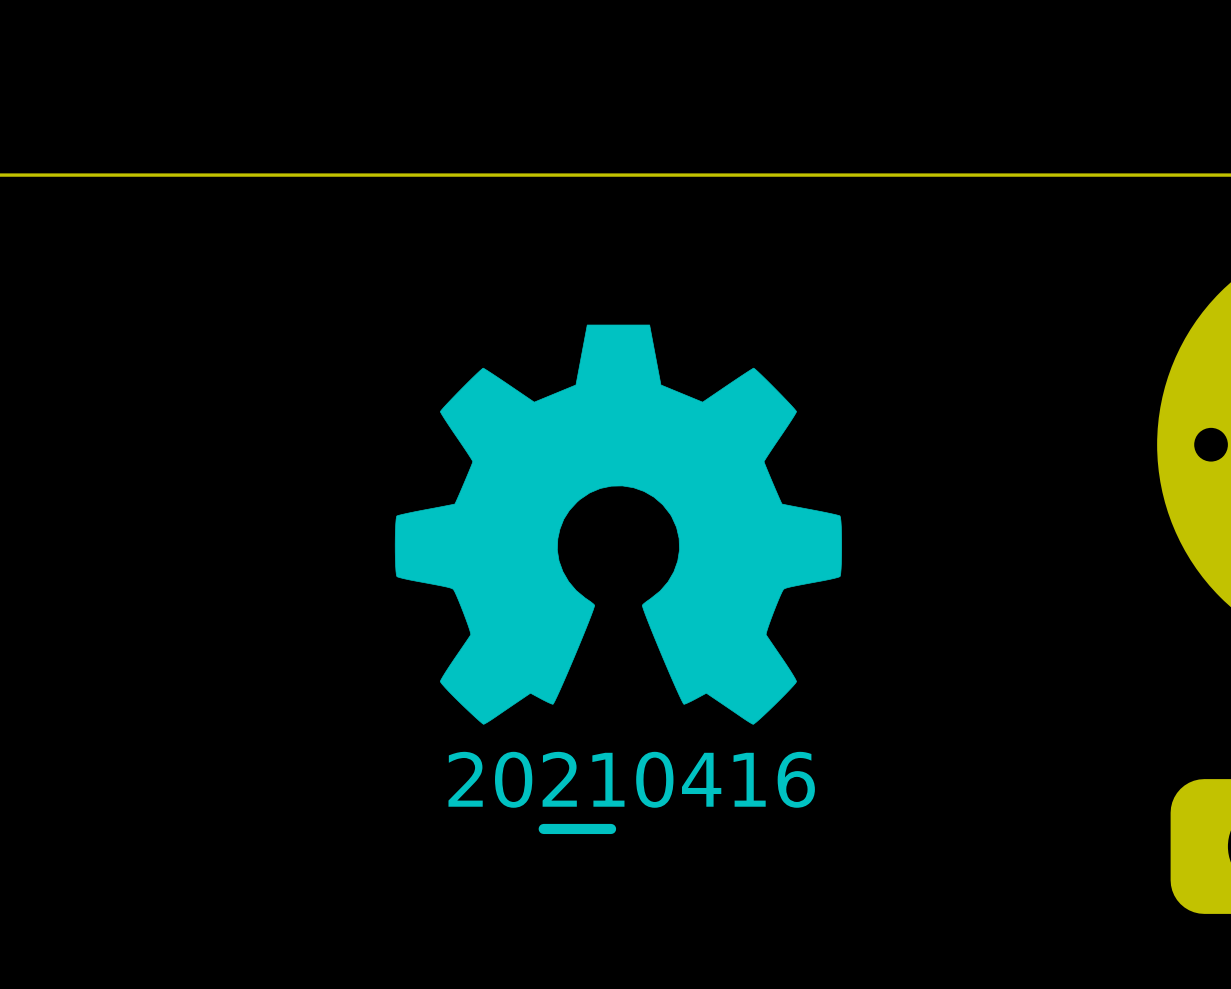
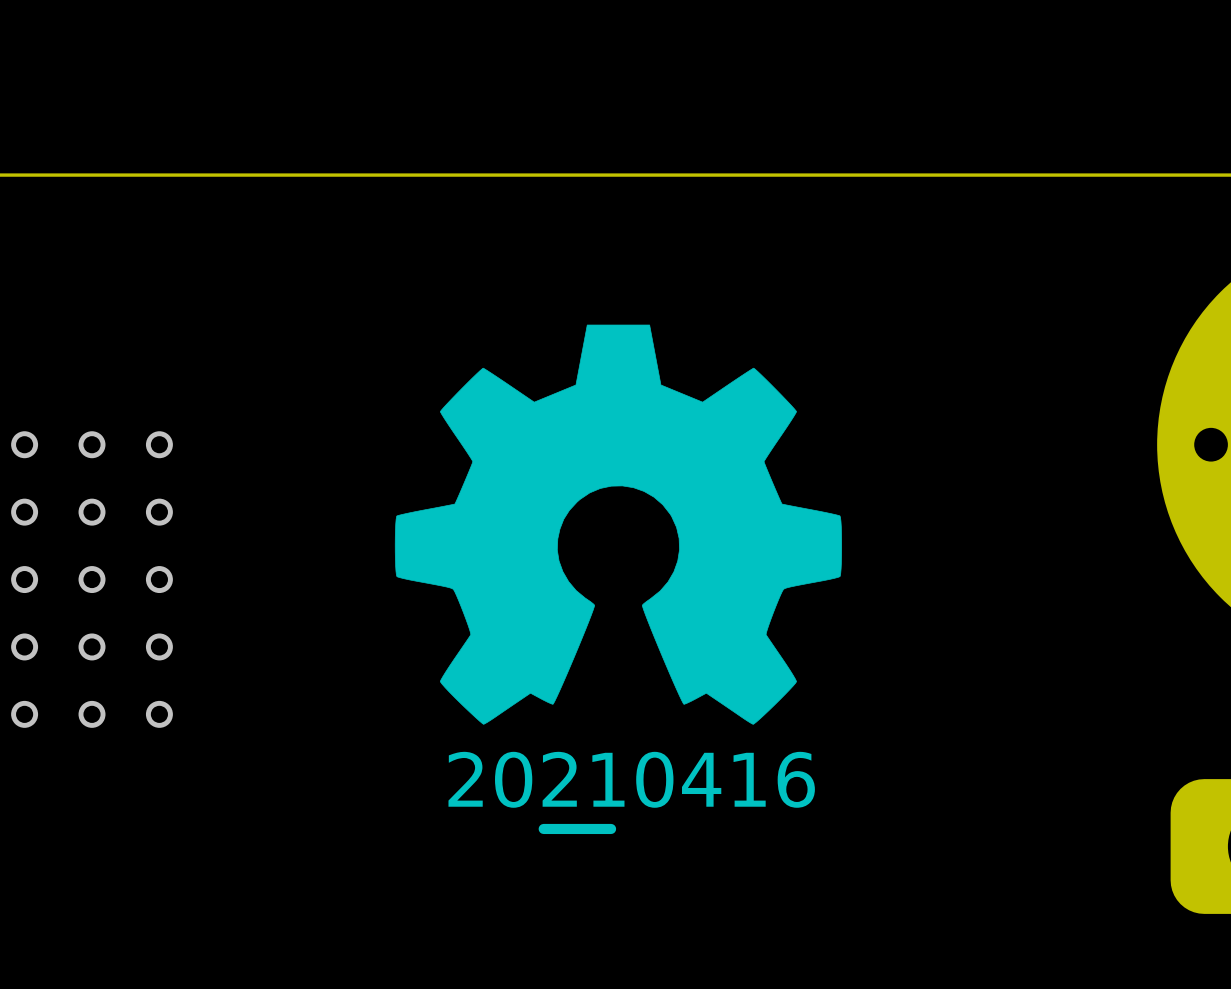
via: none -> (24, 444)
via: none -> (92, 444)
via: none -> (159, 444)
via: none -> (24, 512)
via: none -> (92, 512)
via: none -> (159, 512)
via: none -> (24, 579)
via: none -> (92, 579)
via: none -> (159, 579)
via: none -> (24, 646)
via: none -> (92, 646)
via: none -> (159, 646)
via: none -> (24, 714)
via: none -> (92, 714)
via: none -> (159, 714)

